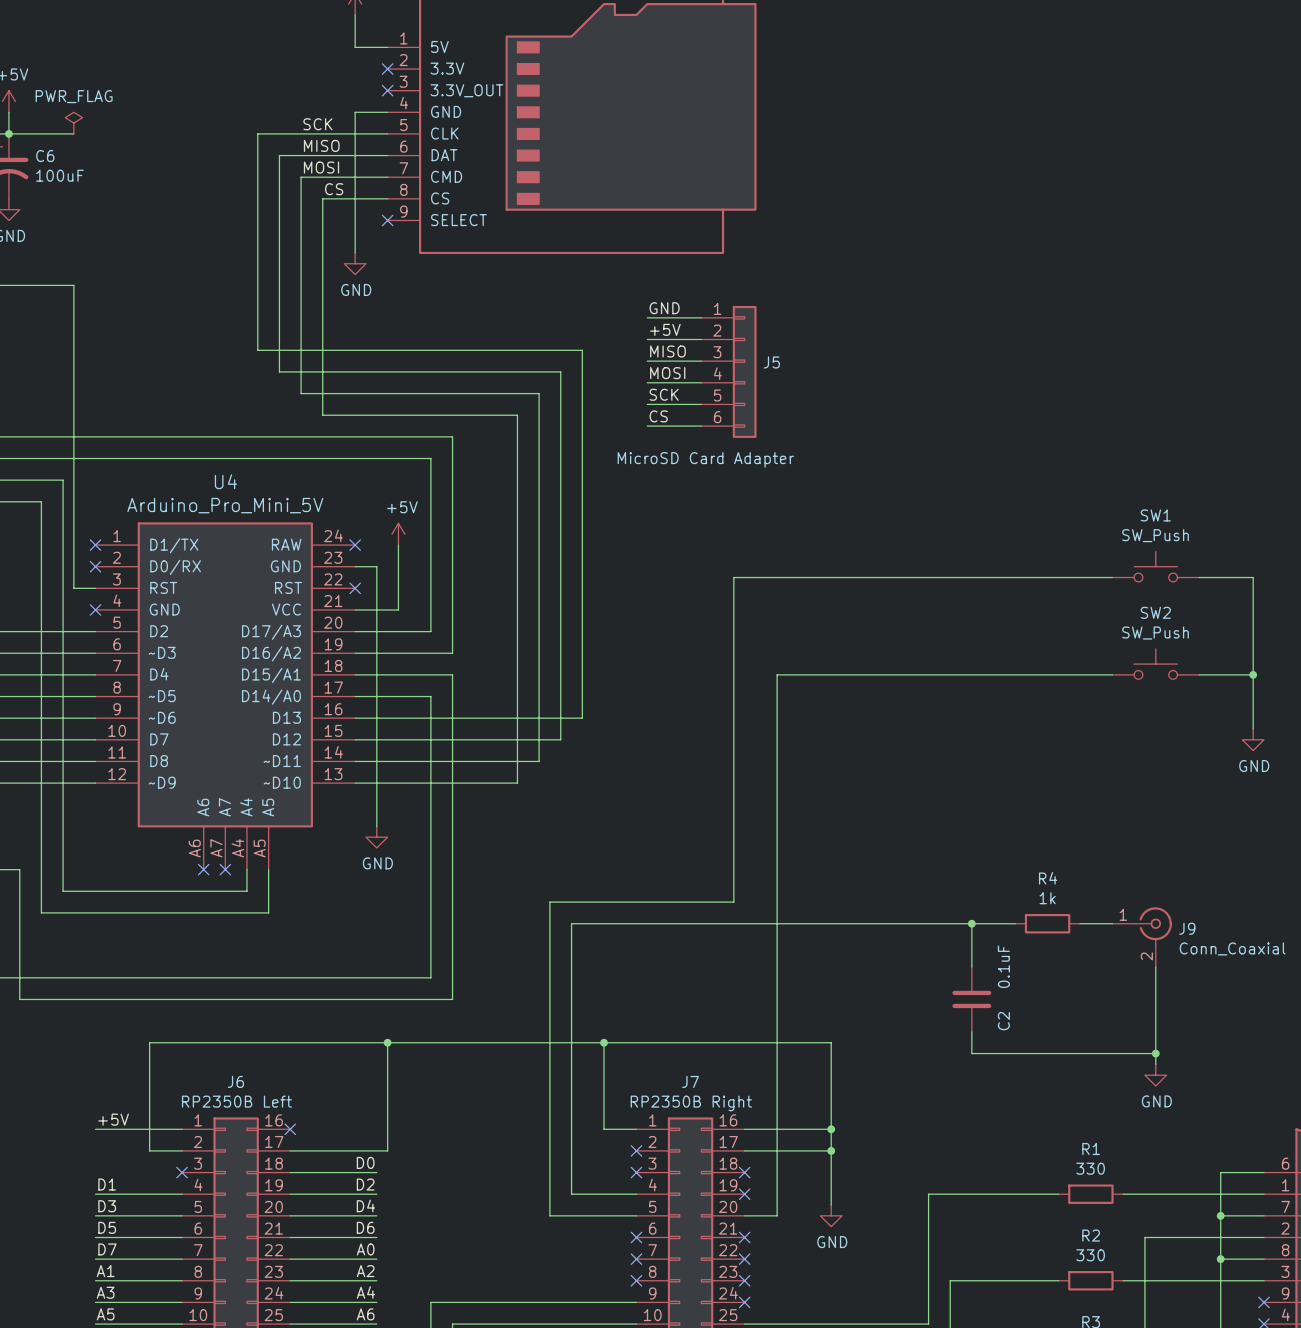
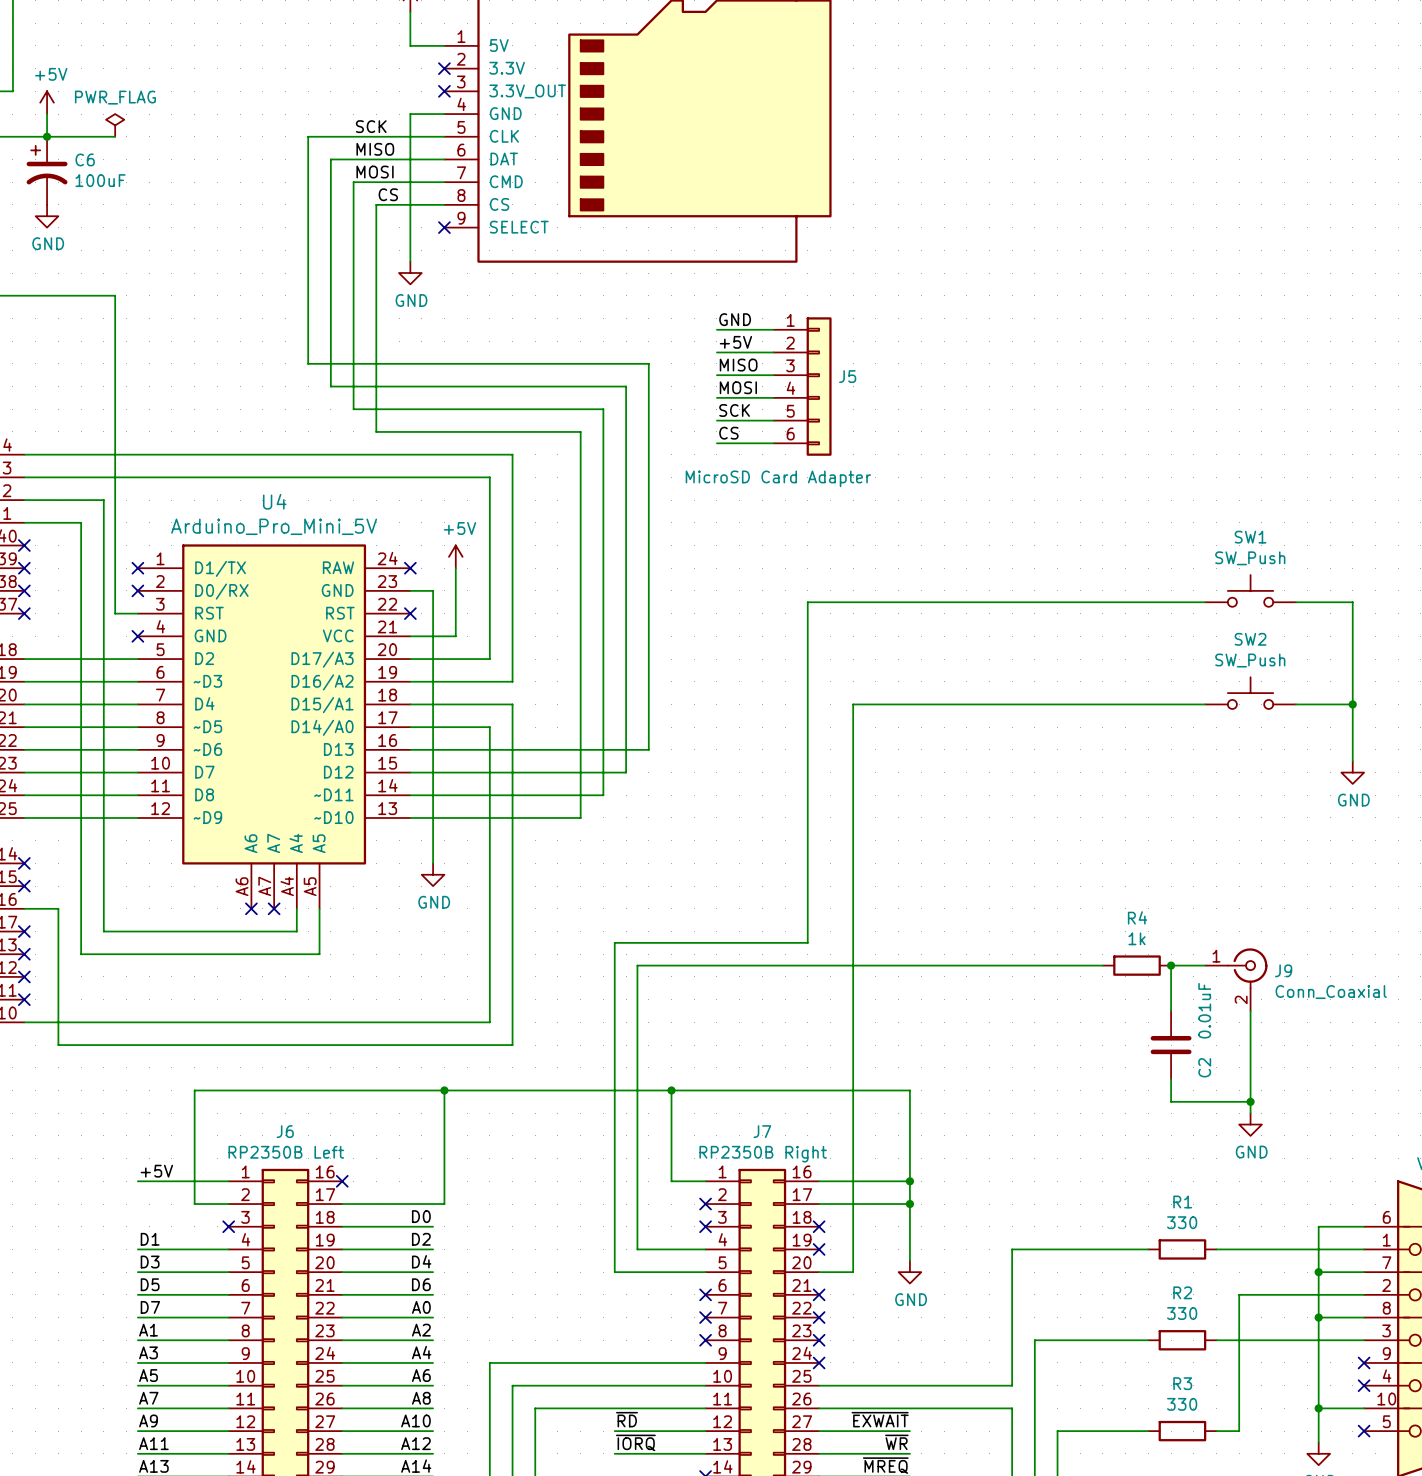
wire: (971, 923) (971, 967) -> (1171, 965) (1171, 1011)
junction: (971, 923) -> none
junction: none -> (1171, 965)
C2 value: 0.1uF (1003, 966) -> 0.01uF (1204, 1010)
C2 position: (971, 999) -> (1171, 1045)
wire: (971, 1031) (971, 1053) (1080, 1053) -> (1171, 1079) (1171, 1101)

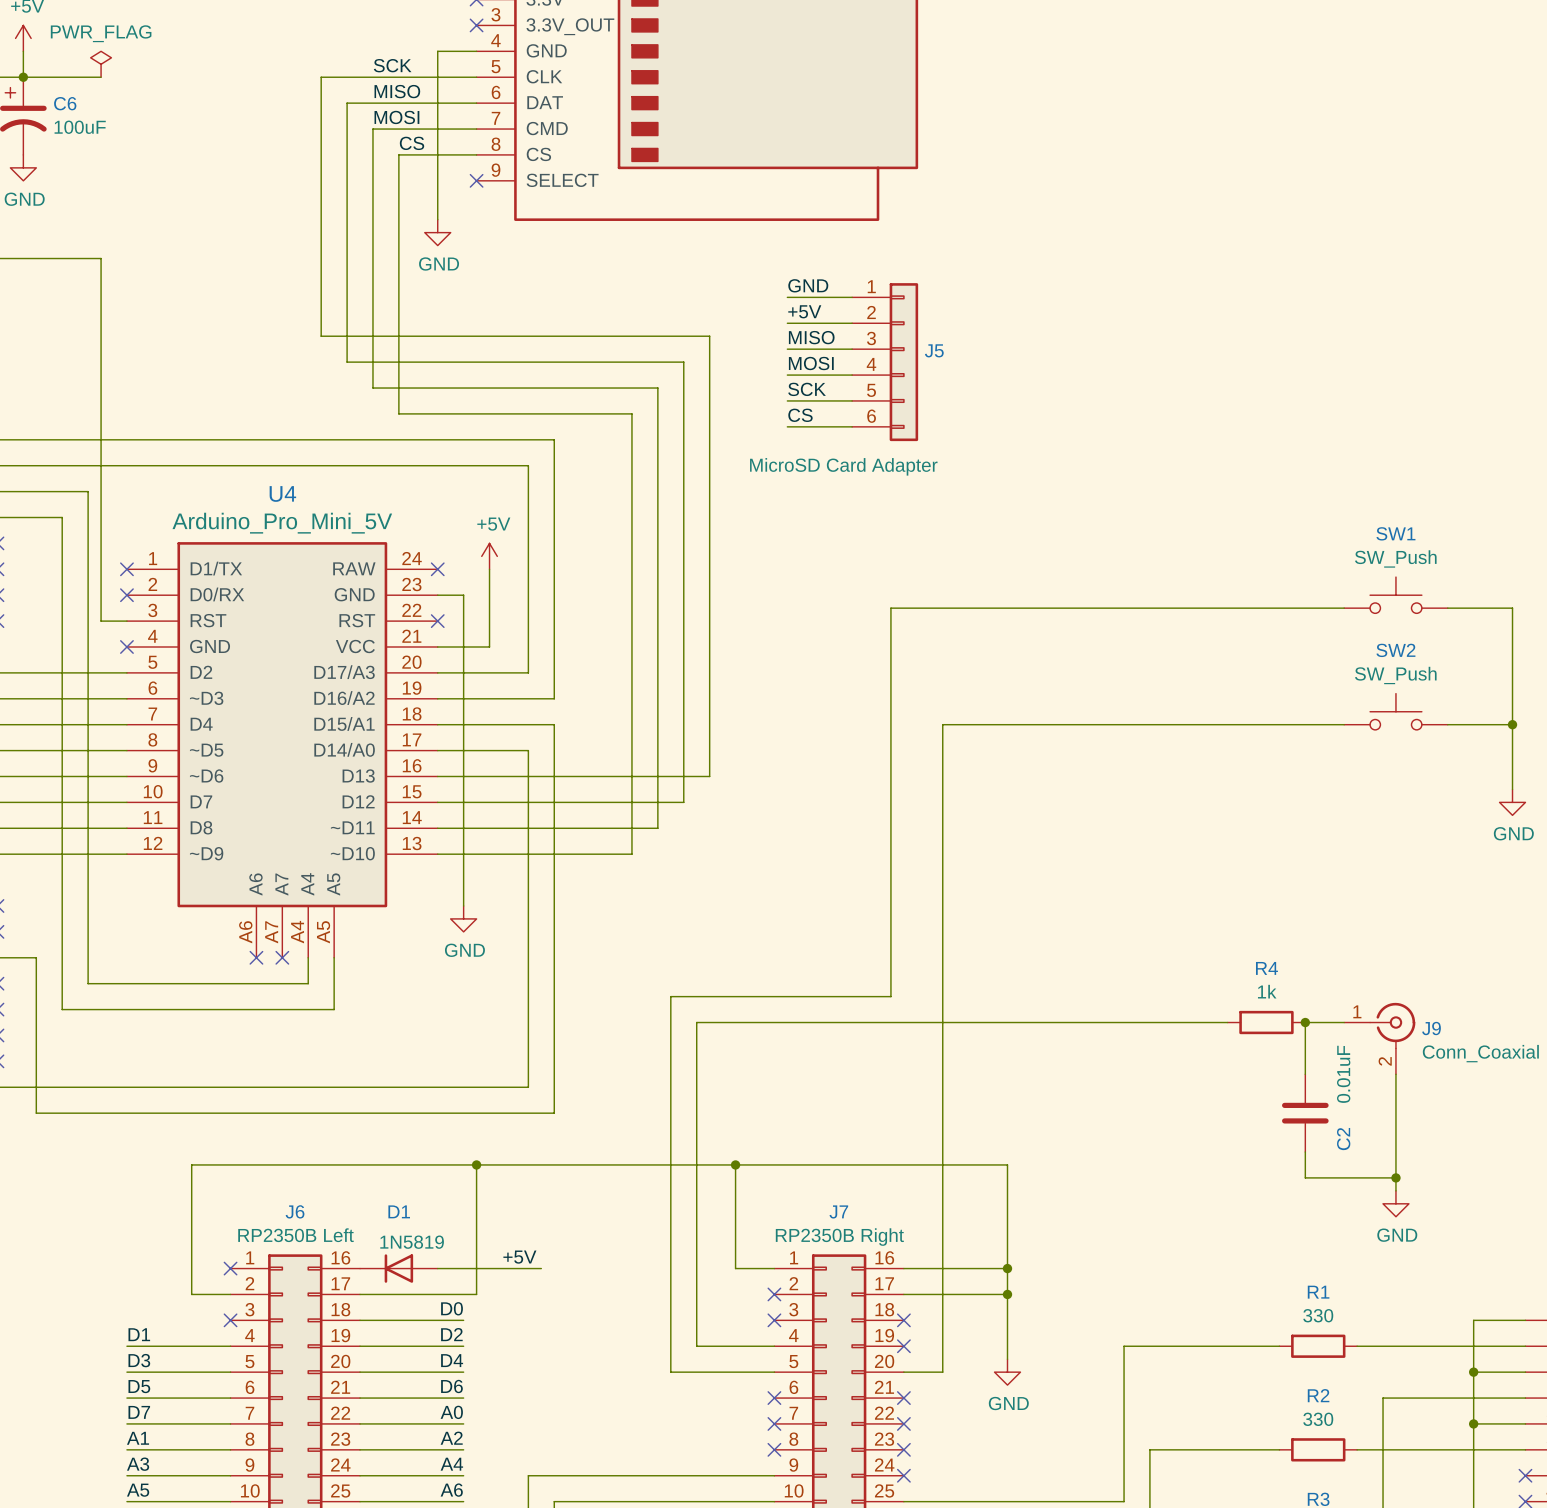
label: +5V (156, 1171) -> none
label: none -> +5V (519, 1257)
wire: (137, 1181) (228, 1181) -> none
no-connect mark: none -> (230, 1268)
no-connect mark: (342, 1181) -> none
D1: none -> 1N5819 (398, 1268)
wire: none -> (437, 1268) (541, 1268)

